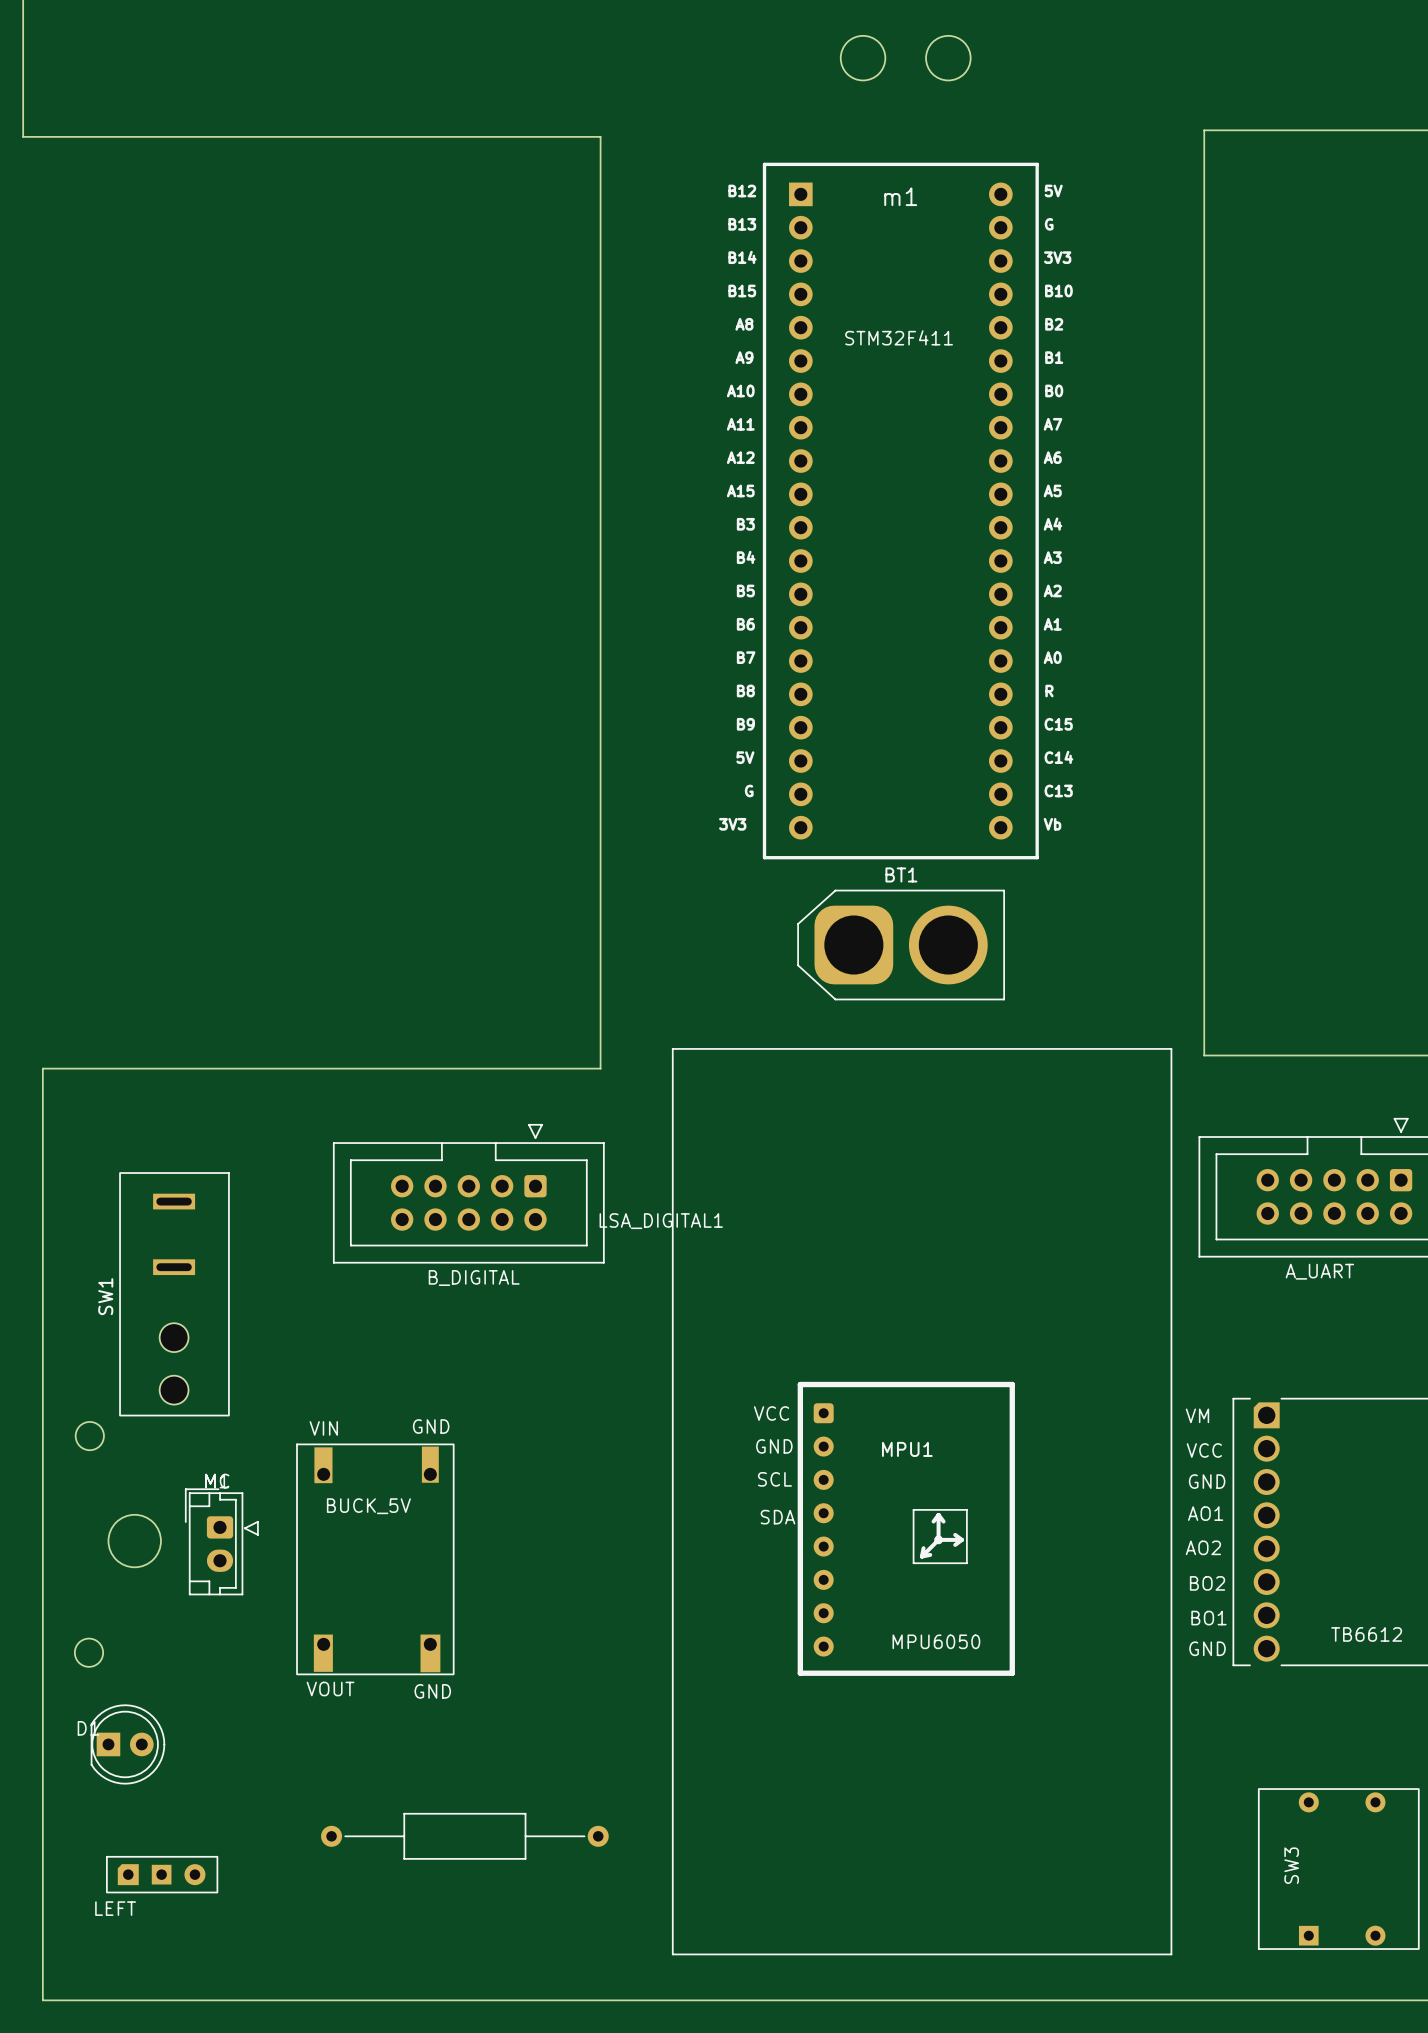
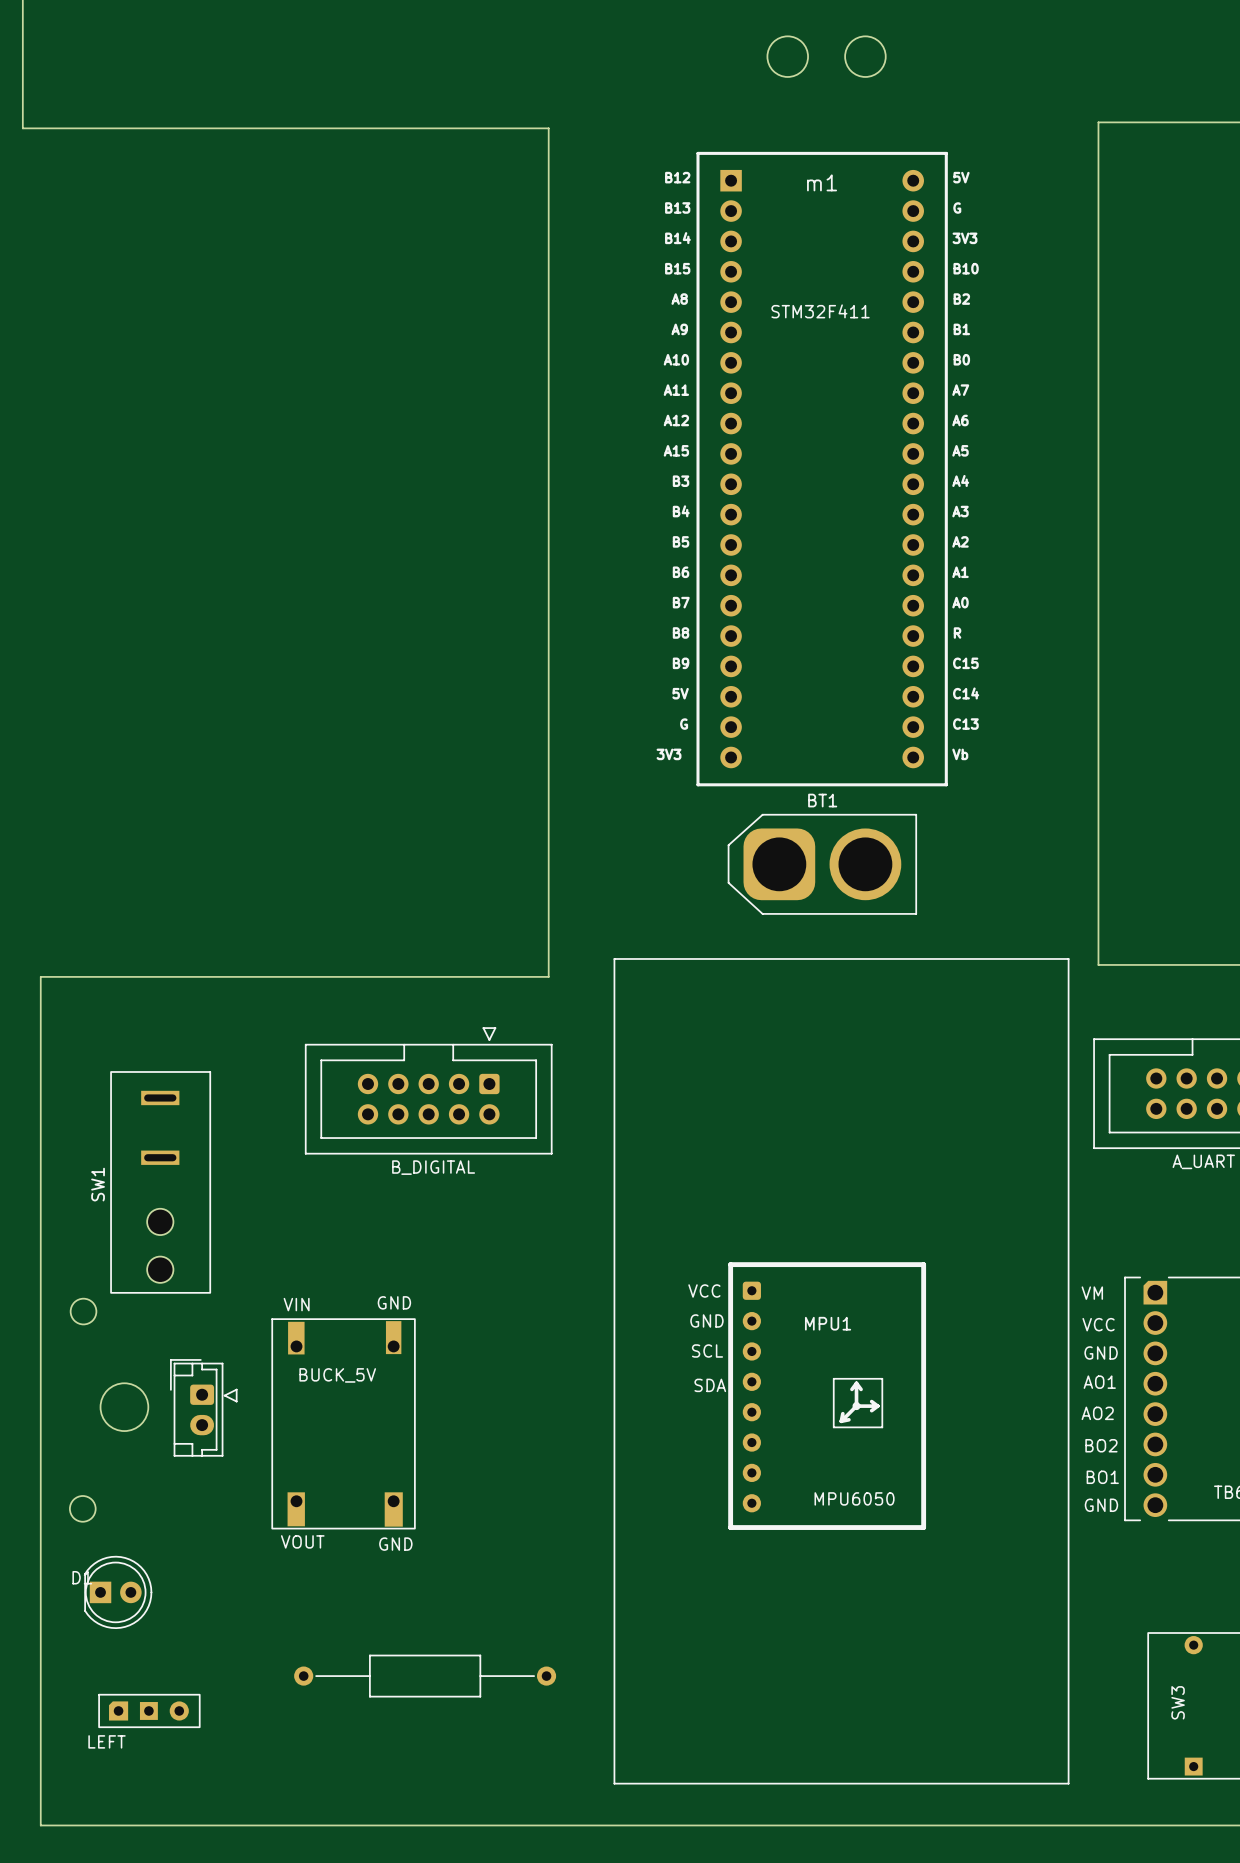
LSA_DIGITAL1 name: LSA_DIGITAL1 (661, 1221) -> none
part footprint: [184, 1488, 259, 1596] -> [170, 1359, 238, 1457]

